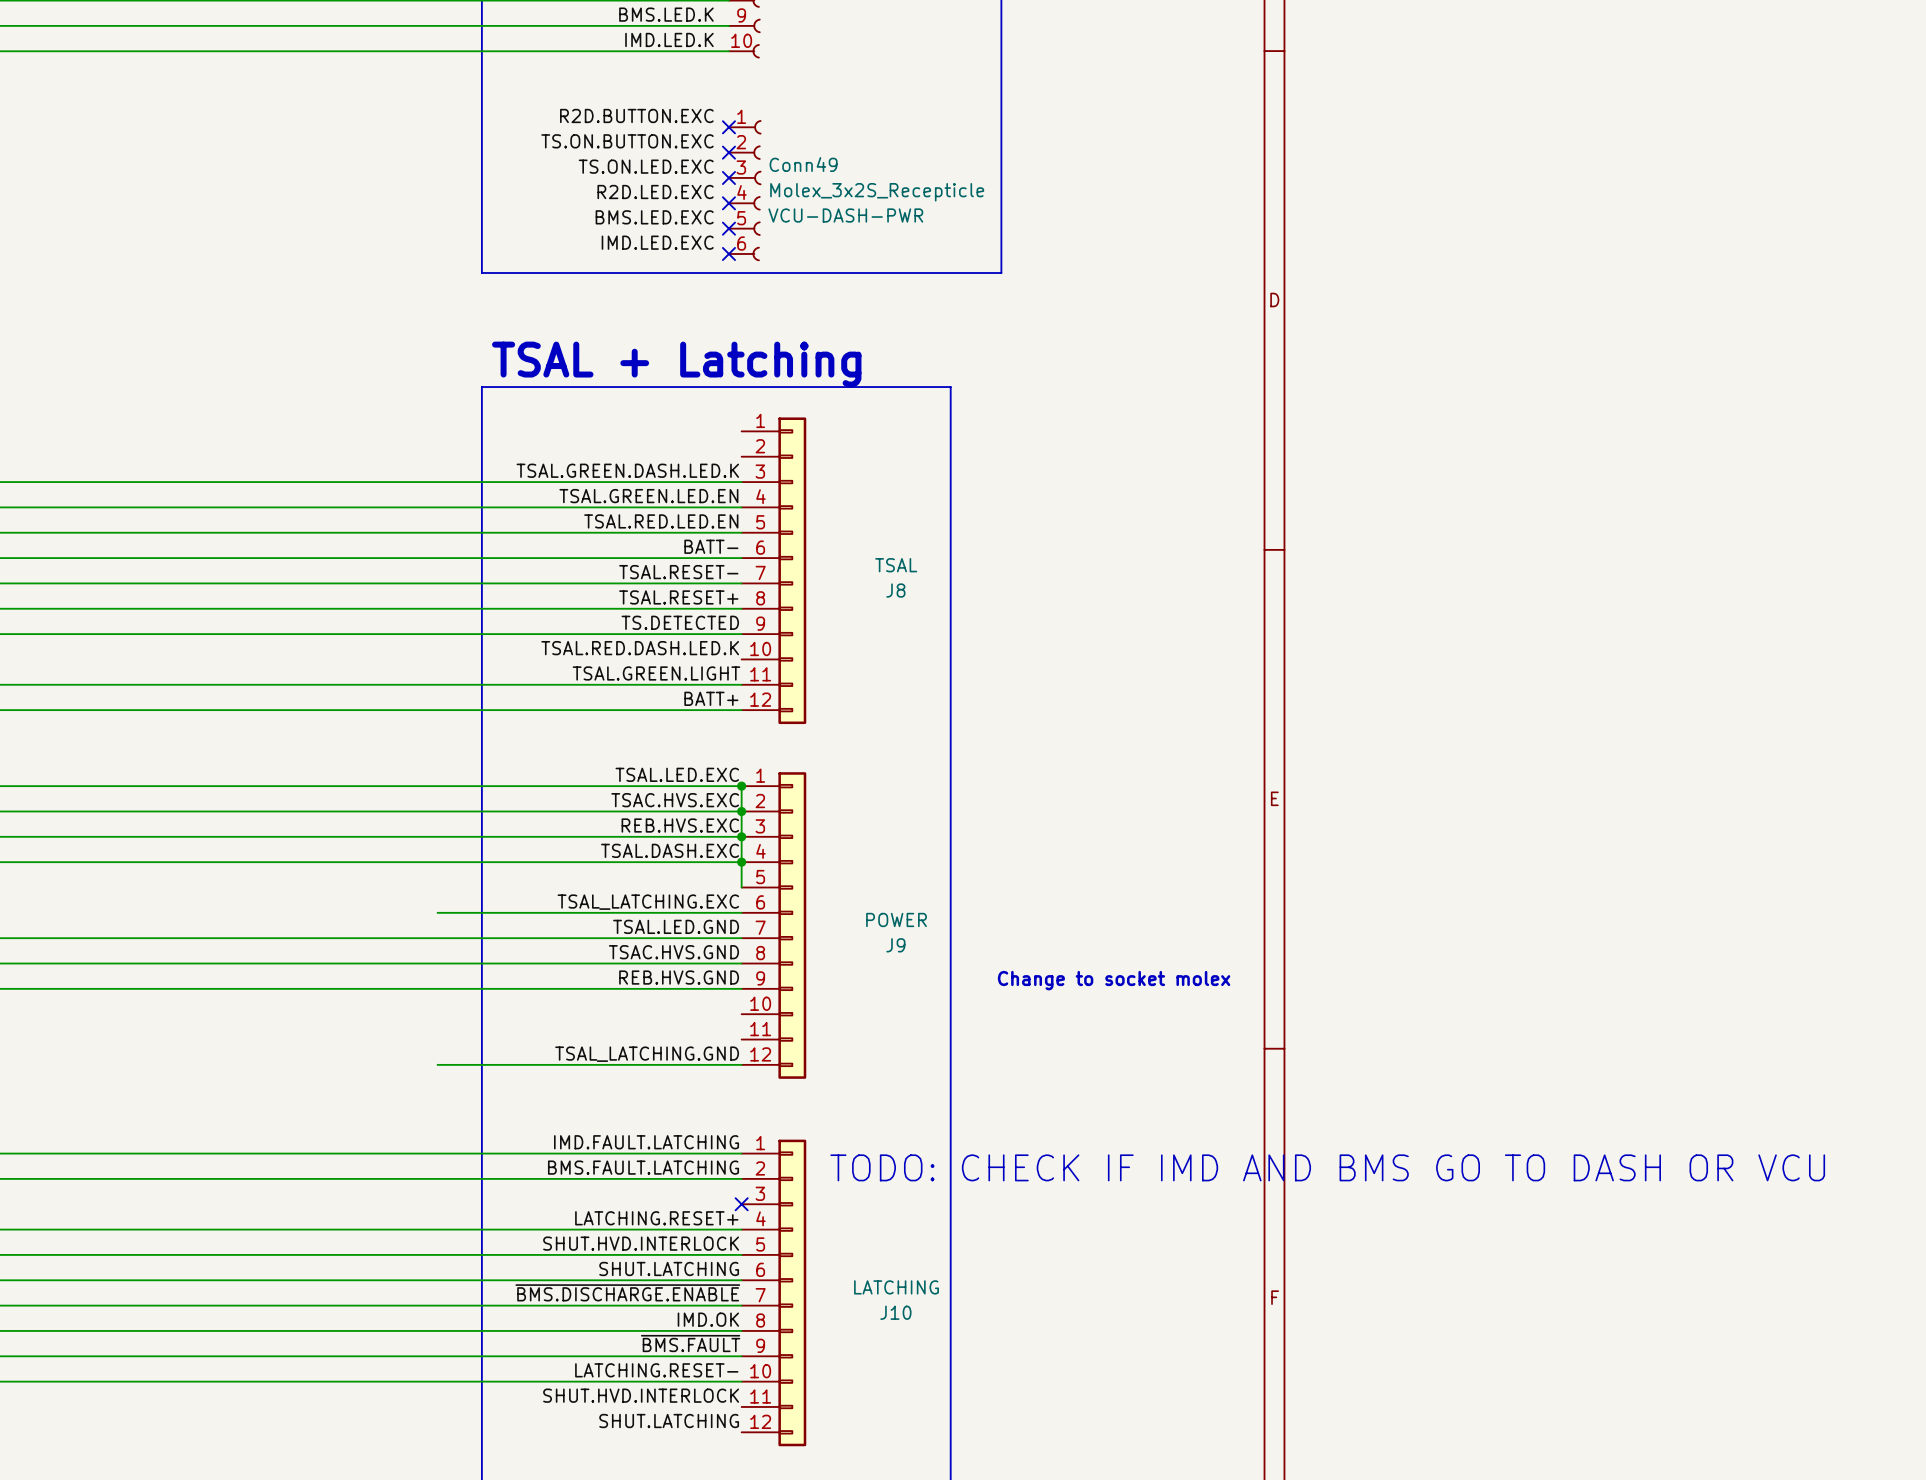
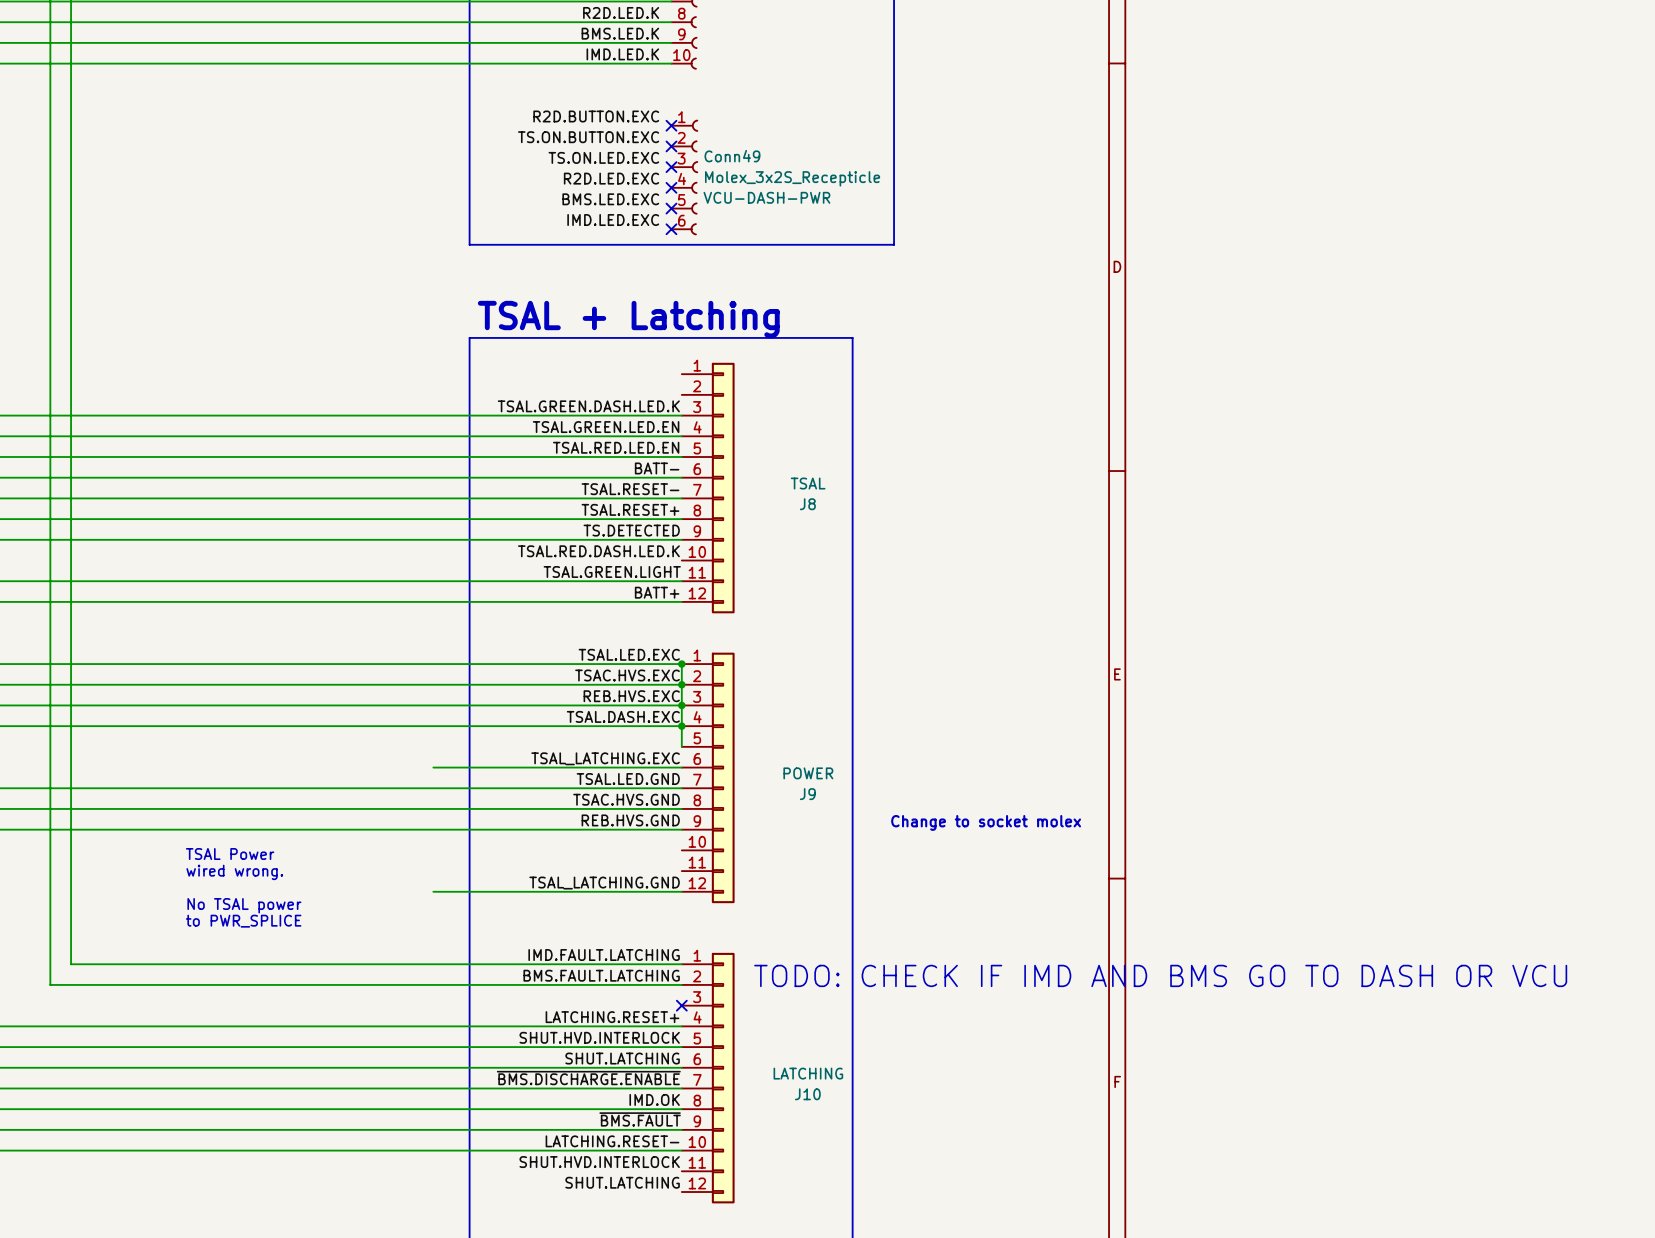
text: none -> TSAL Power (230, 854)
text: none -> wired wrong. (234, 872)
text: none -> No TSAL power (244, 905)
text: none -> to PWR_SPLICE (243, 921)

